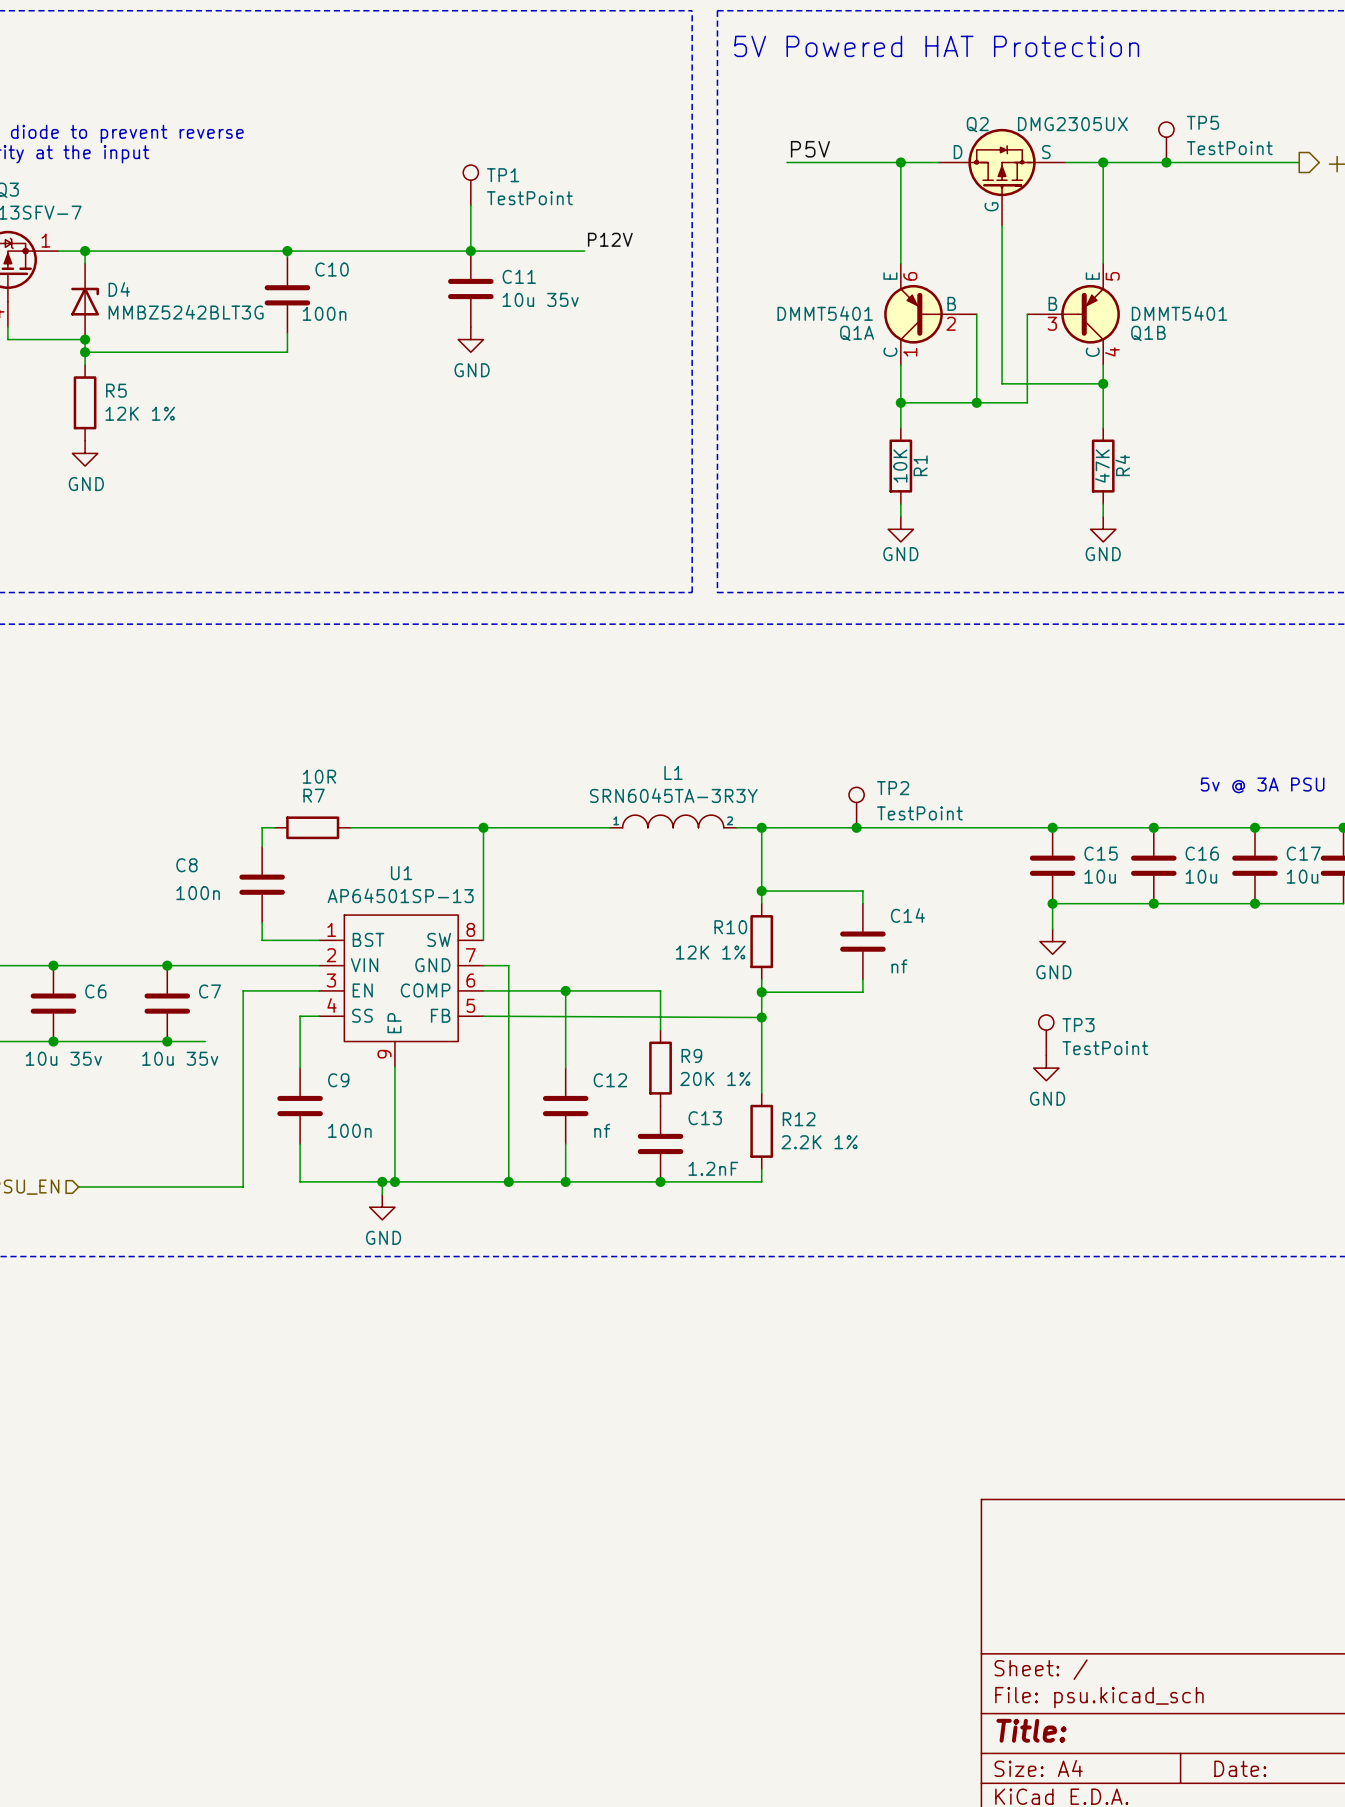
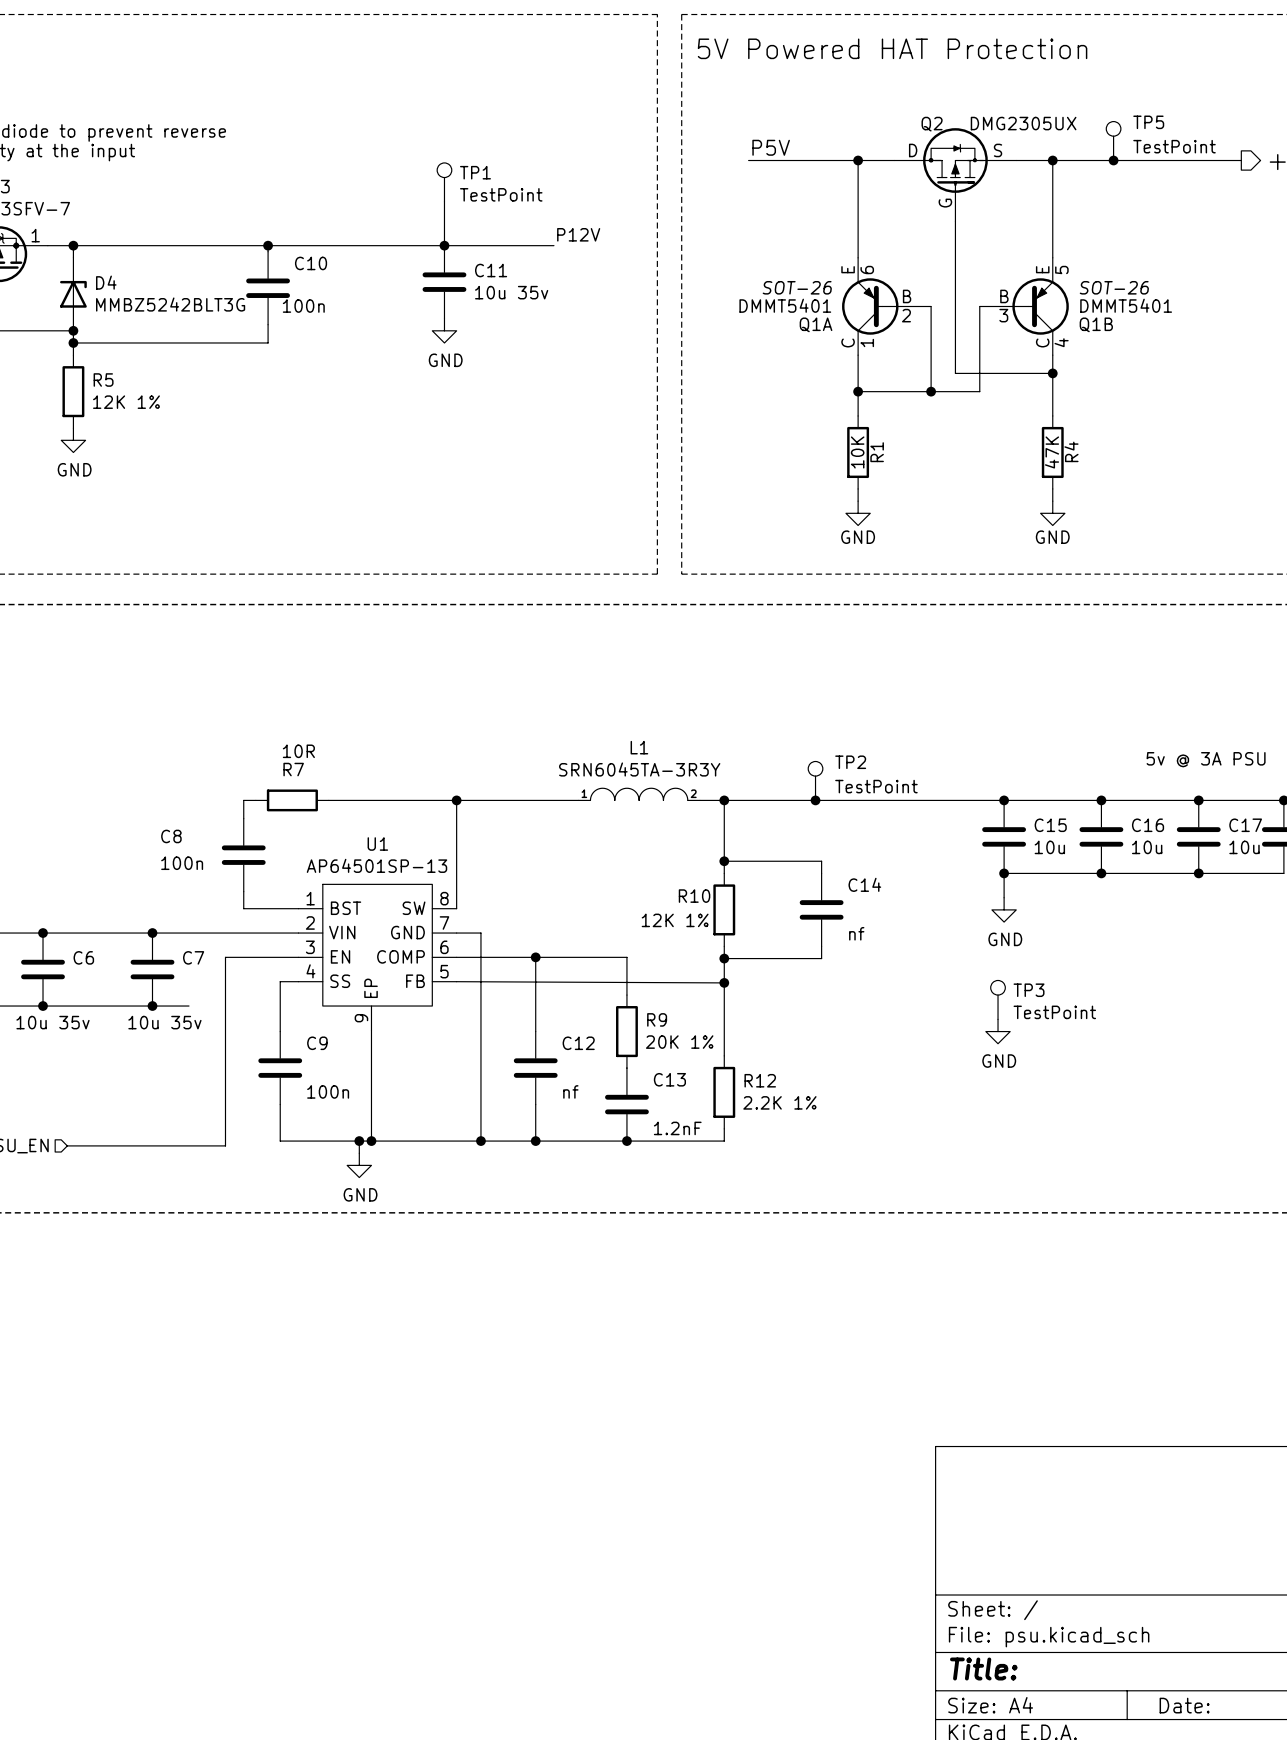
Q1A text: none -> SOT-26 (797, 287)
Q1B text: none -> SOT-26 (1114, 287)

